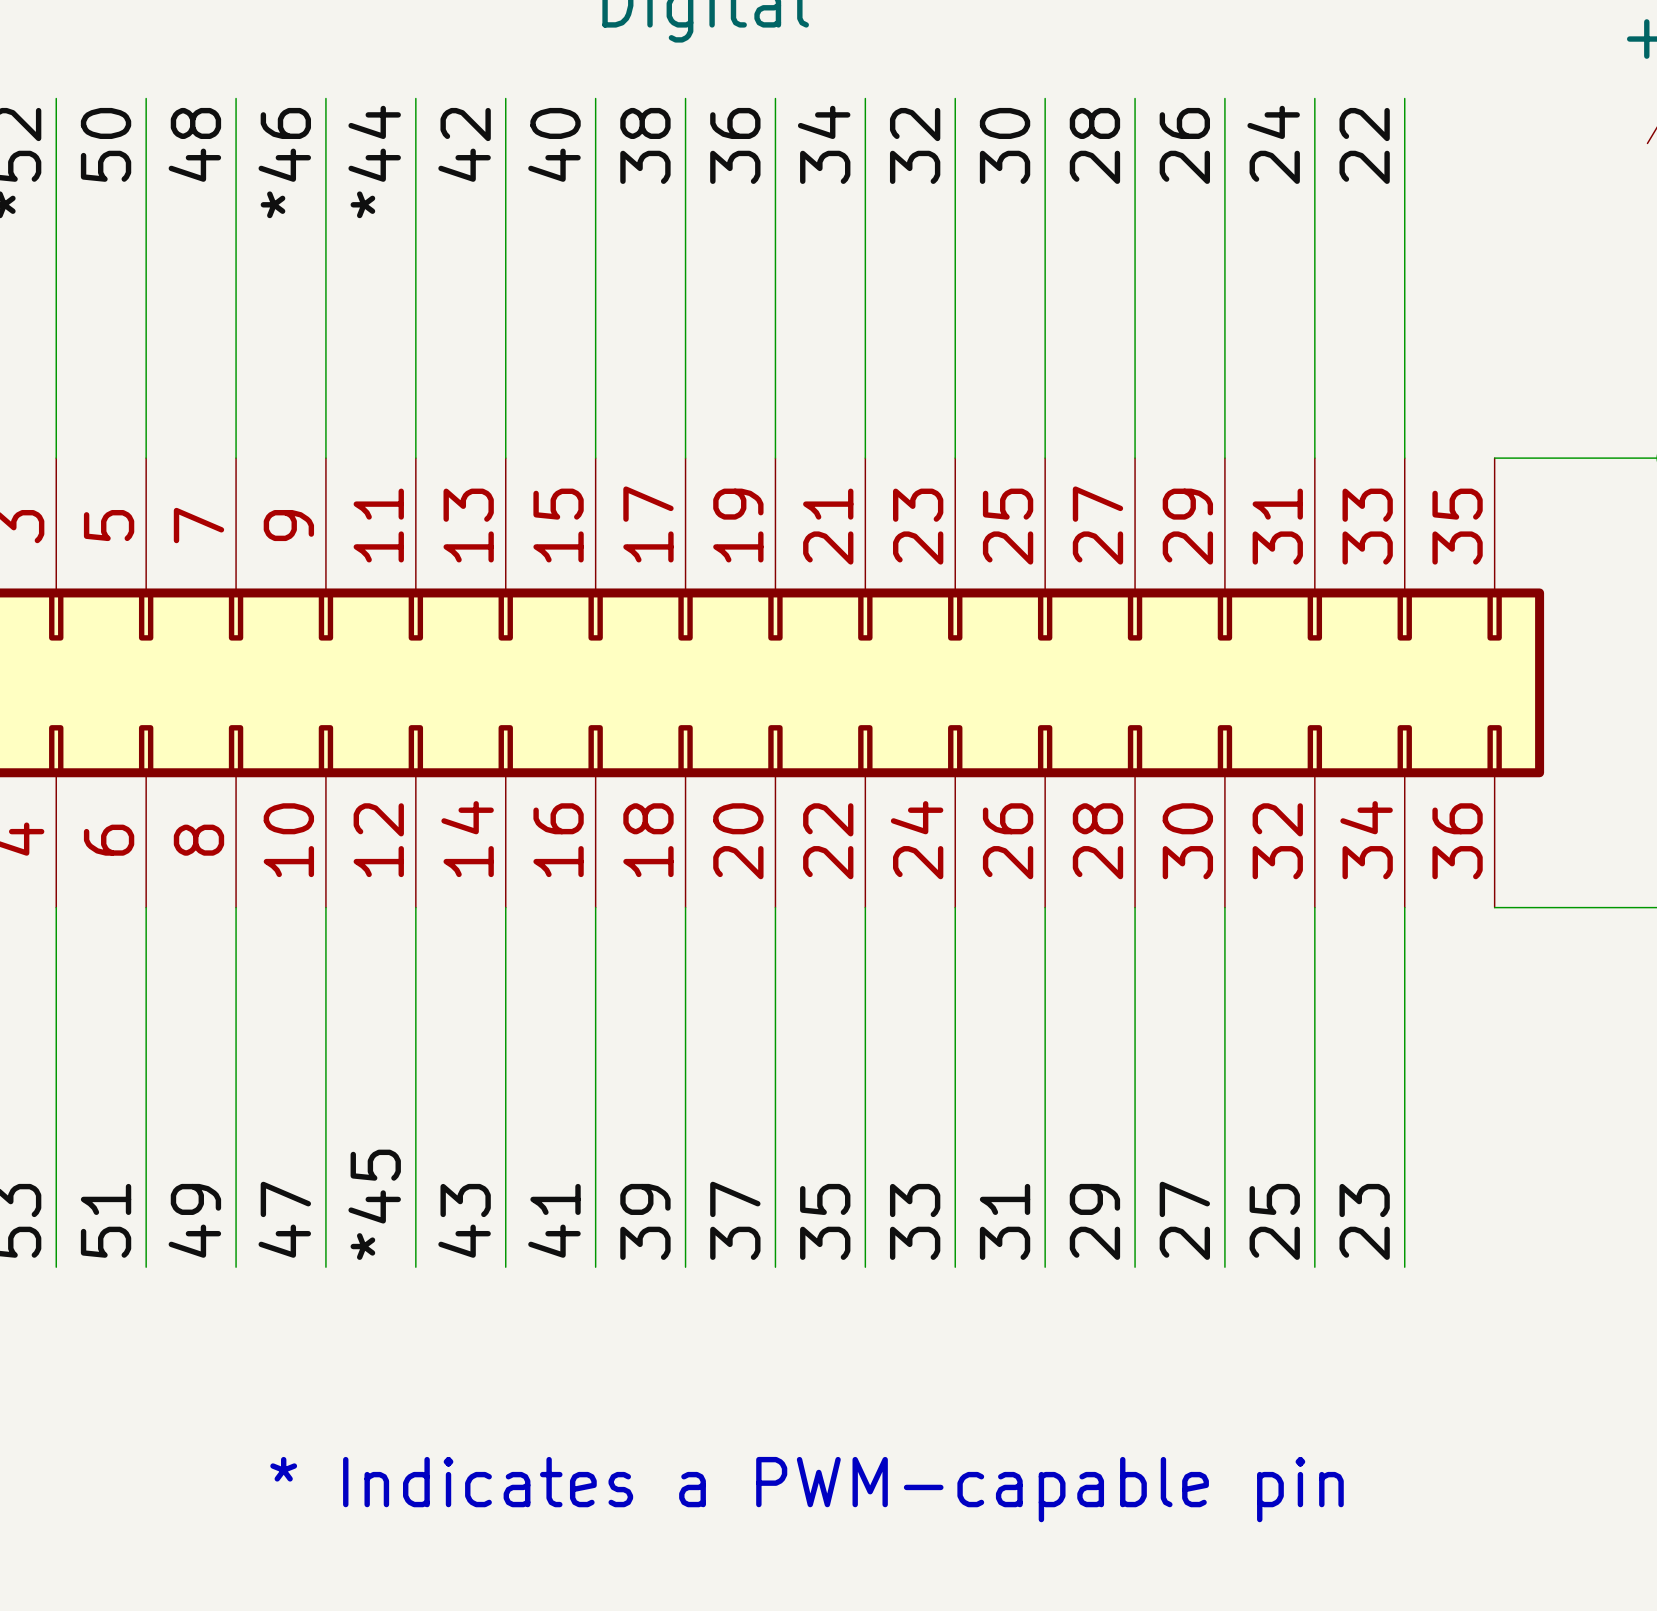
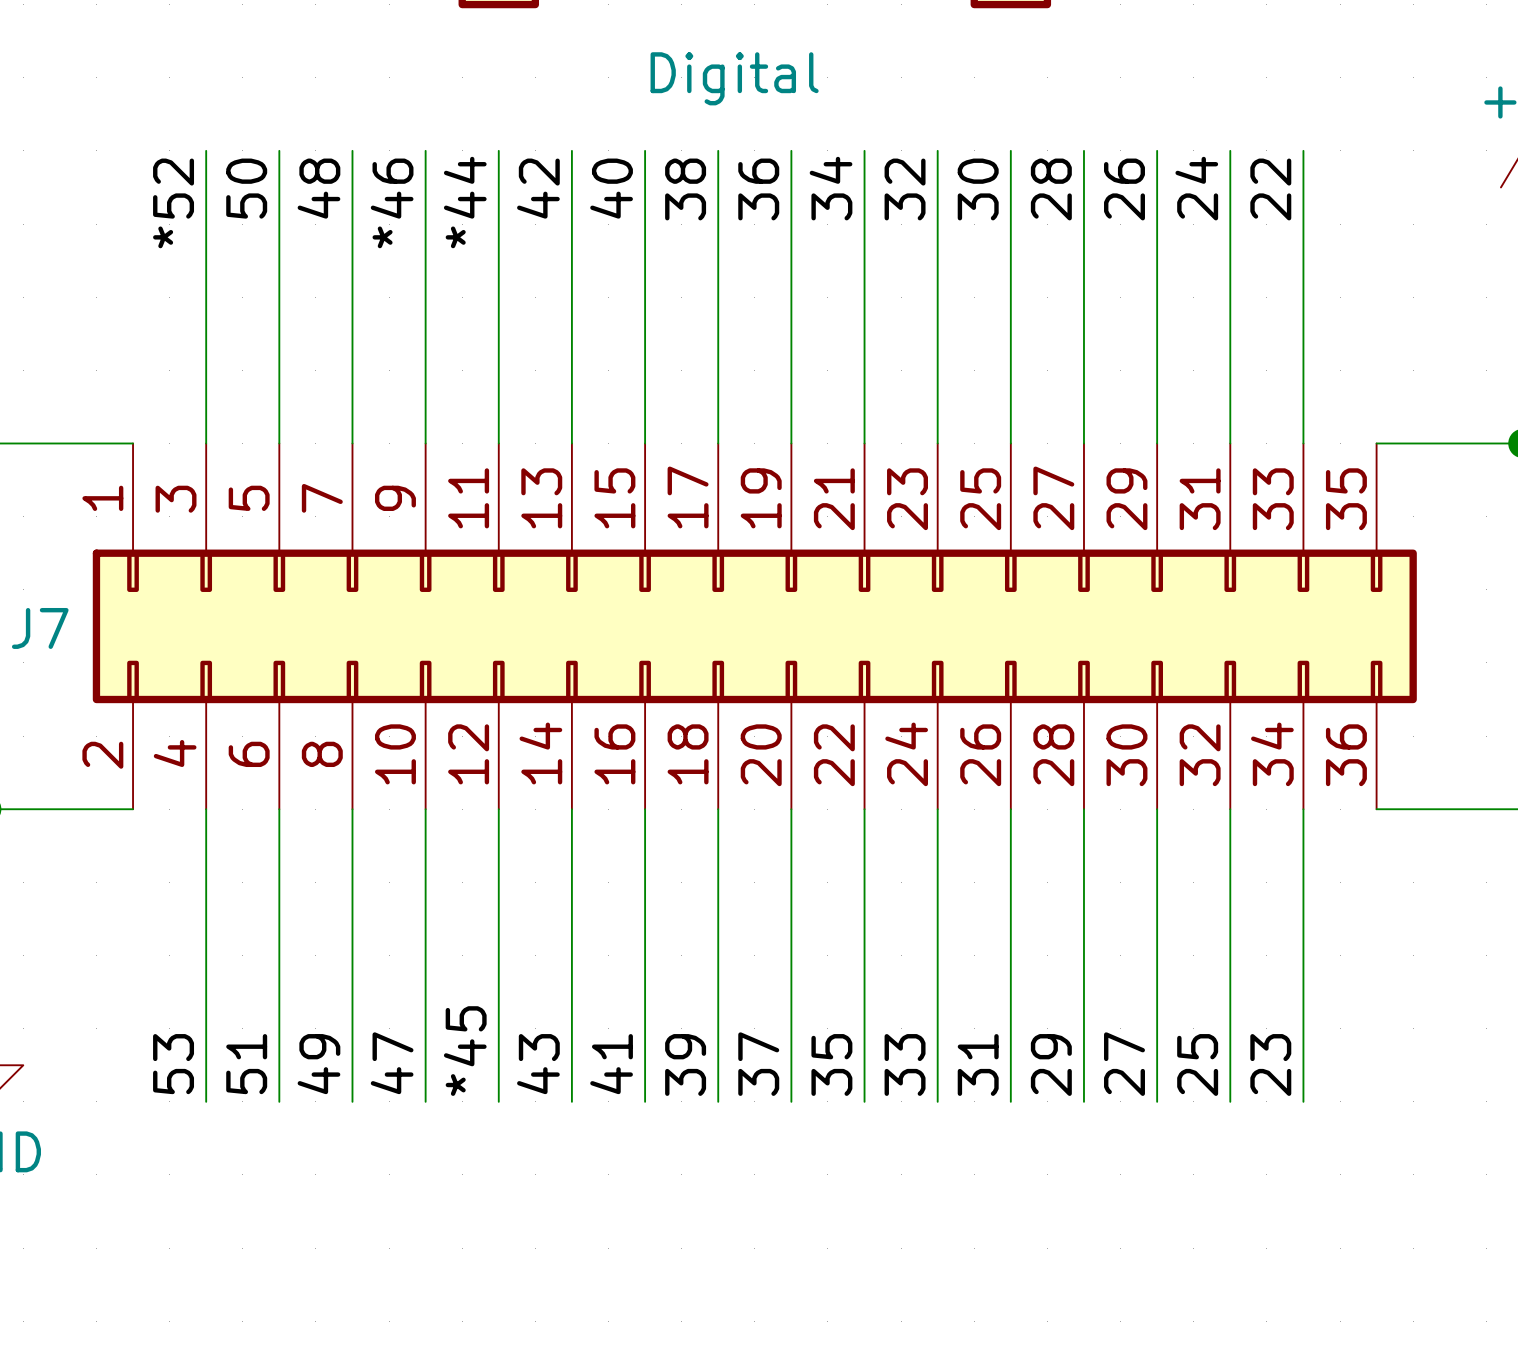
text: * Indicates a PWM-capable pin (807, 1489) -> none

